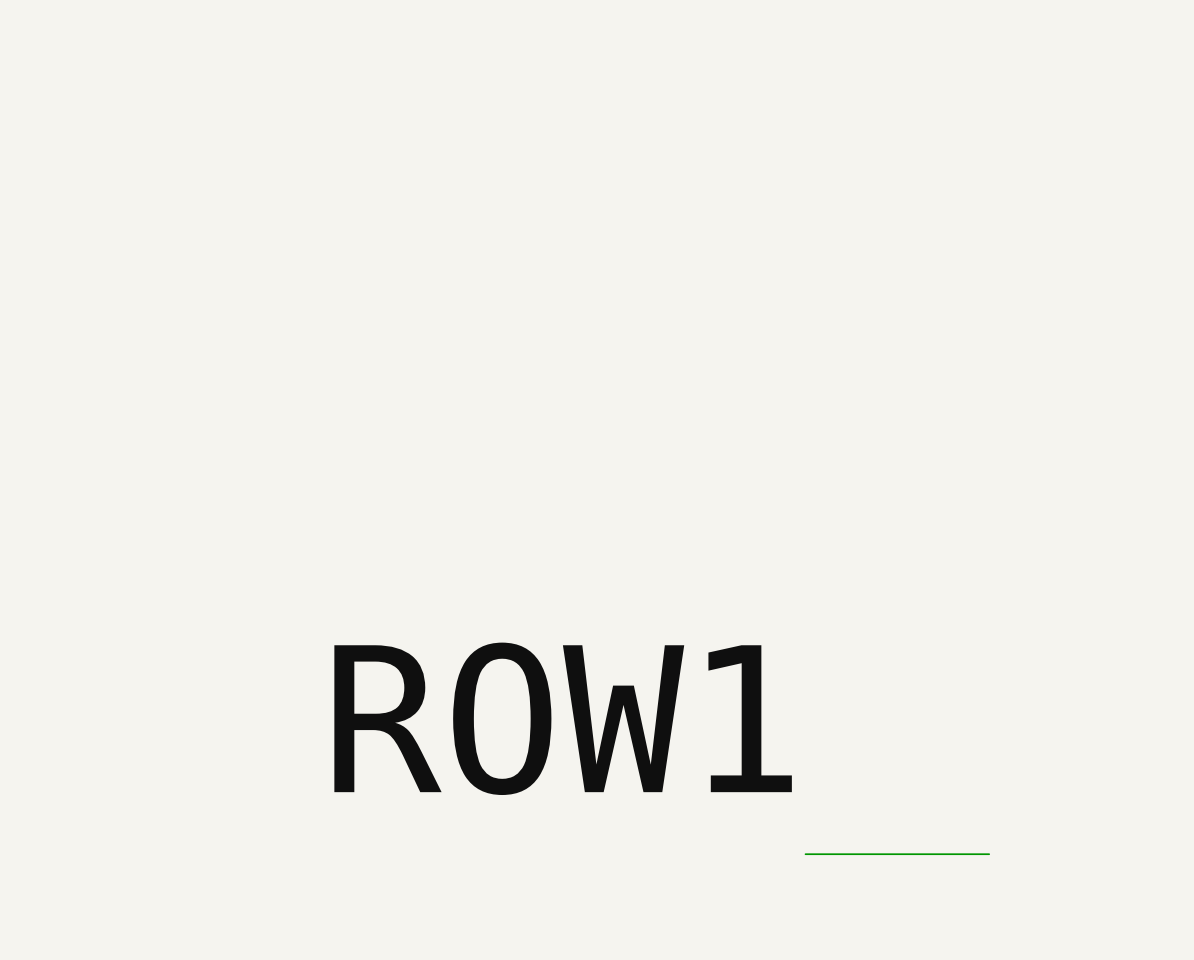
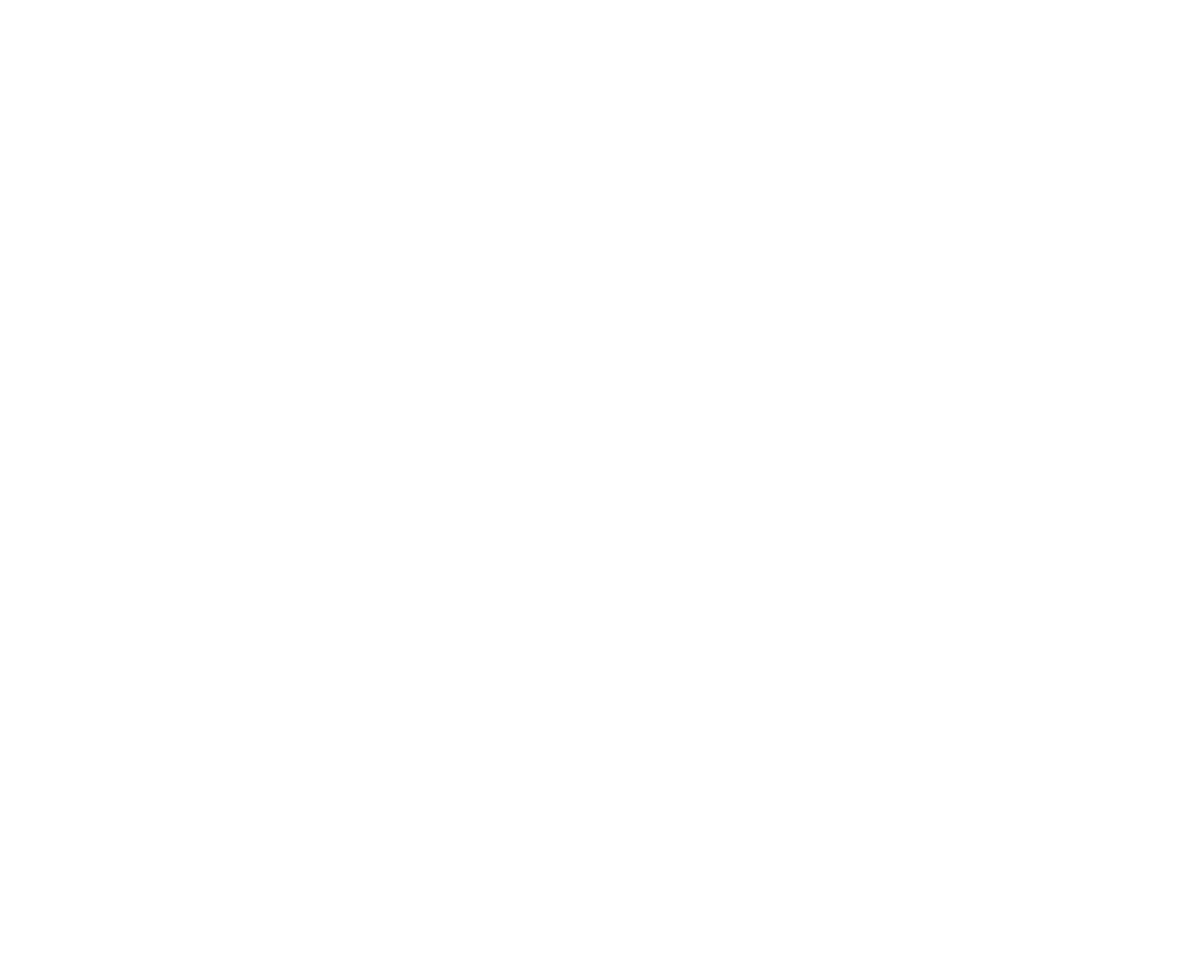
label: ROW1 (563, 718) -> none
wire: (805, 854) (989, 854) -> none

